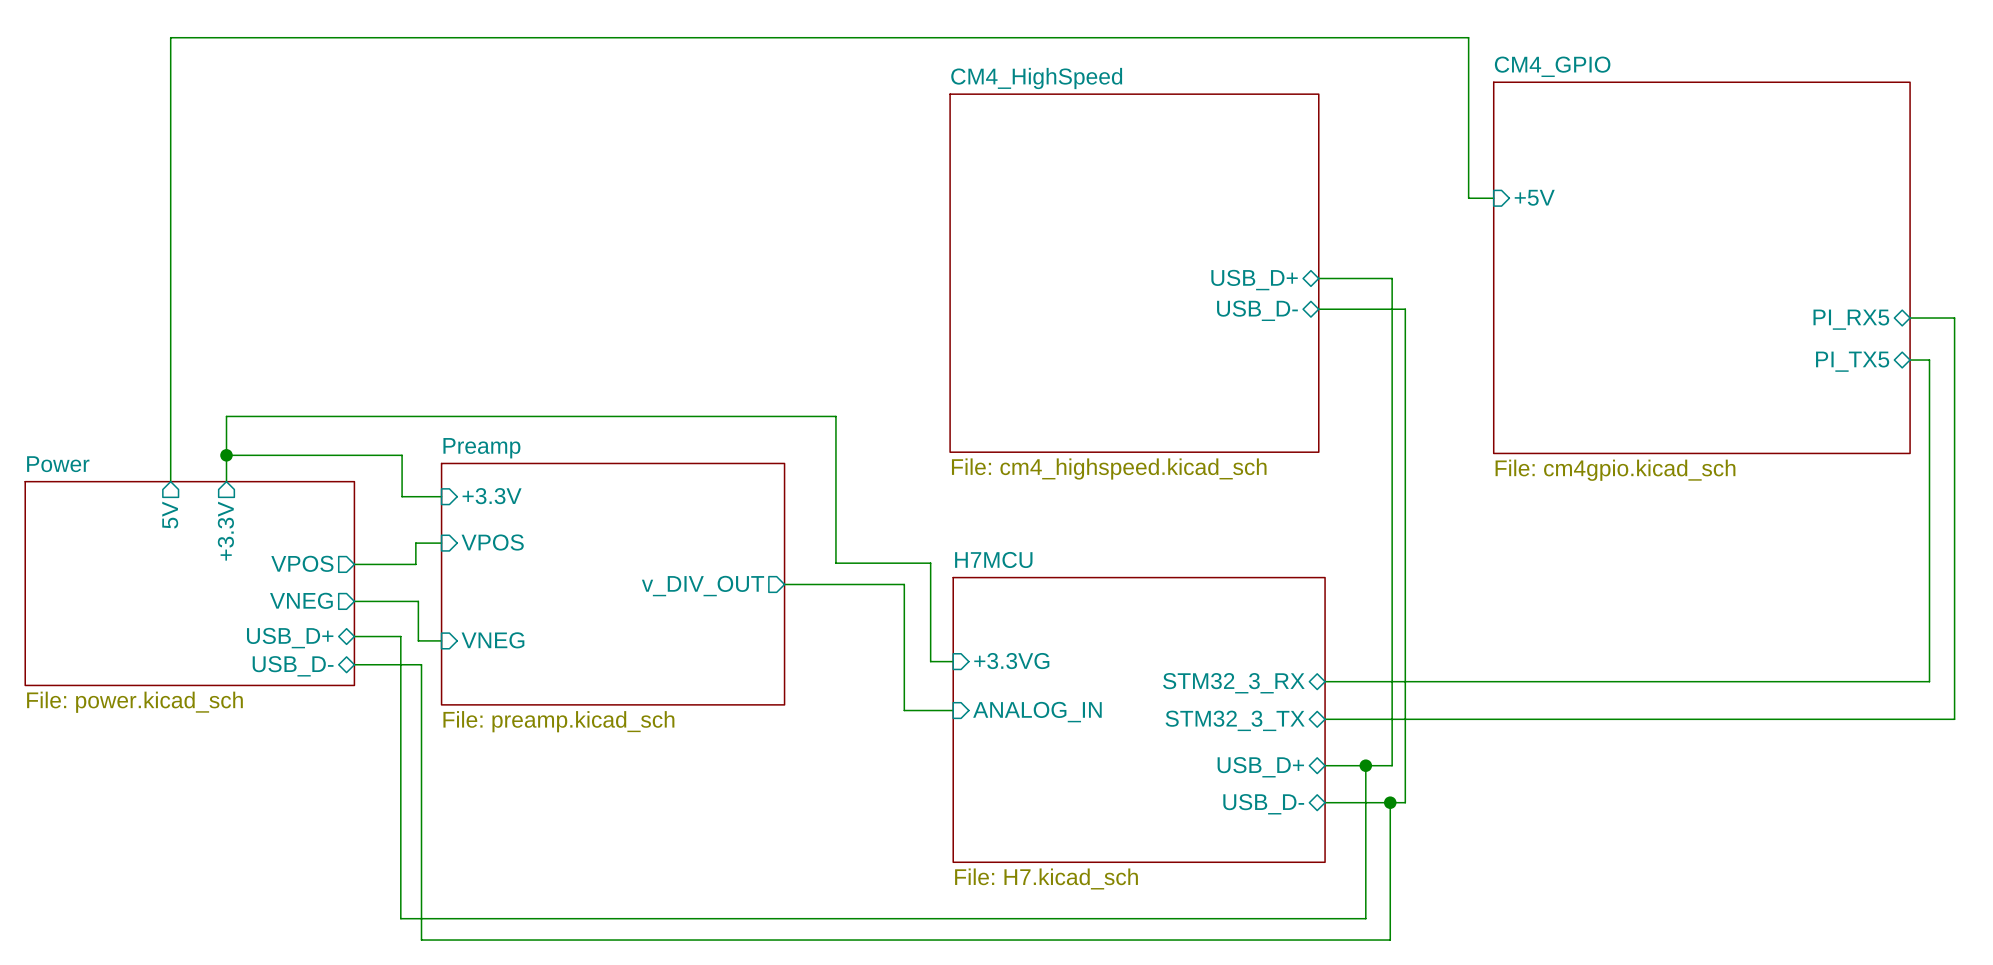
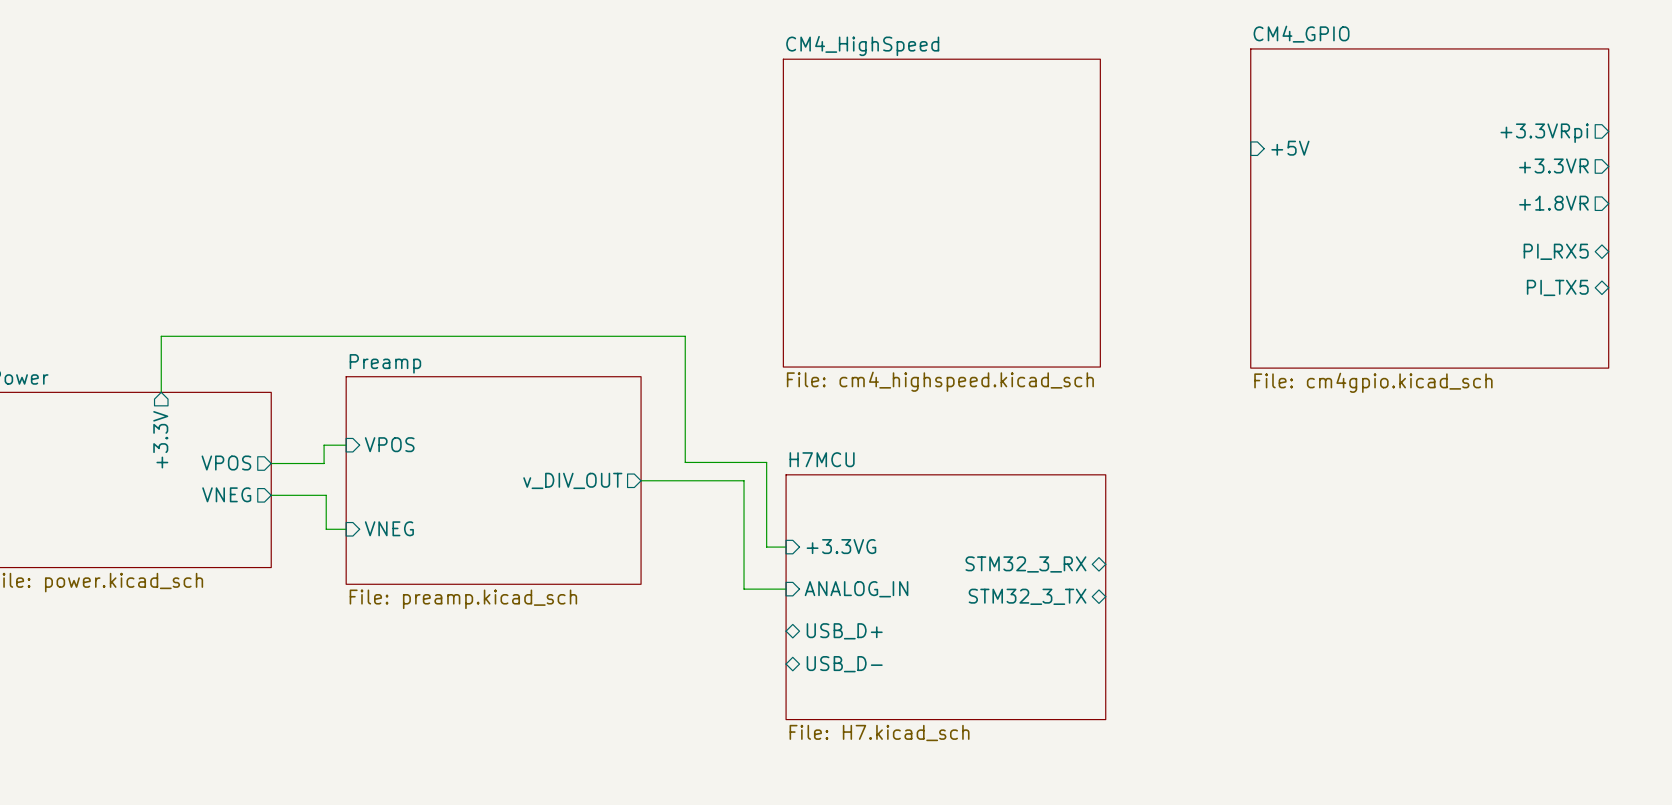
sheet pin: none -> +3.3VRpi (1544, 133)
wire: (1493, 198) (1468, 198) (1468, 37) (170, 37) (170, 481) -> none
sheet pin: none -> +3.3VR (1553, 165)
sheet pin: none -> +1.8VR (1553, 203)
wire: (1318, 278) (1392, 278) (1392, 765) (1325, 765) -> none
sheet pin: USB_D+ (1254, 280) -> none
wire: (1318, 309) (1405, 309) (1405, 802) (1325, 802) -> none
sheet pin: USB_D- (1257, 310) -> none
wire: (1910, 318) (1954, 318) (1954, 719) (1325, 719) -> none
wire: (1910, 360) (1929, 360) (1929, 681) (1325, 681) -> none
wire: (226, 455) (402, 455) (402, 496) (441, 496) -> none
junction: (226, 455) -> none
sheet pin: +3.3V (492, 496) -> none
sheet pin: 5V (170, 515) -> none
wire: (354, 636) (400, 636) (400, 918) (1365, 918) (1365, 765) -> none
sheet pin: USB_D+ (290, 638) -> none
wire: (354, 664) (421, 664) (421, 940) (1390, 940) (1390, 802) -> none
sheet pin: USB_D- (293, 666) -> none
sheet pin: none -> USB_D+ (844, 631)
junction: (1365, 765) -> none
sheet pin: USB_D+ (1260, 767) -> none
sheet pin: none -> USB_D- (844, 664)
junction: (1390, 802) -> none
sheet pin: USB_D- (1263, 804) -> none

